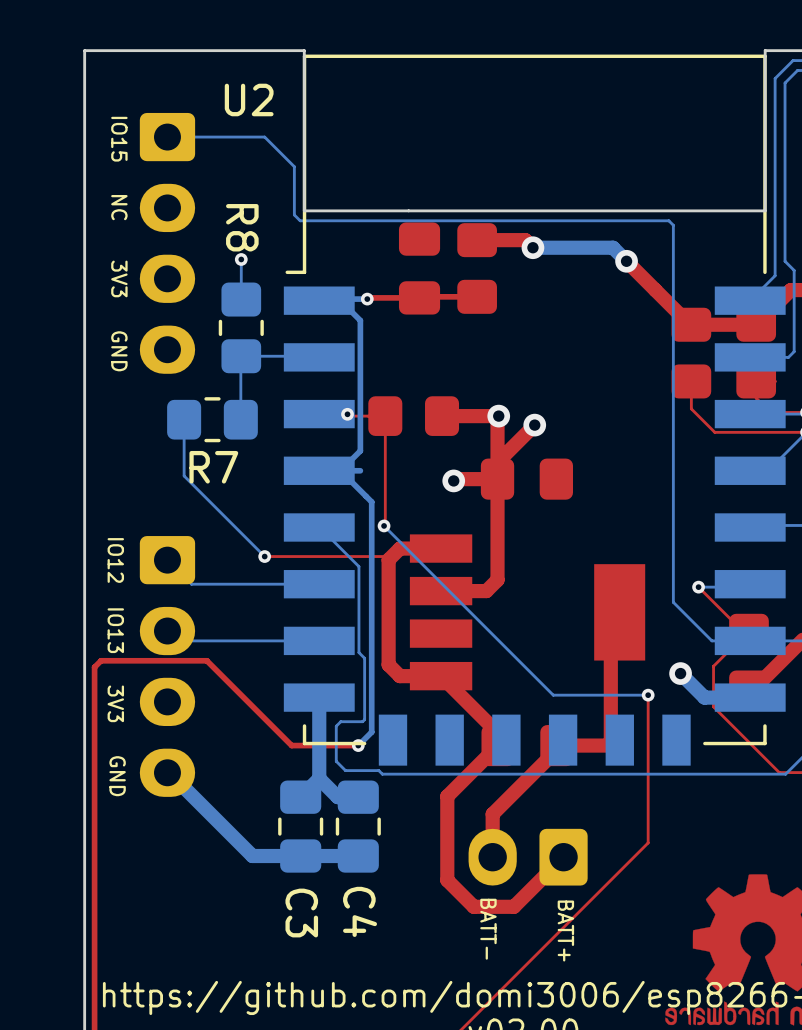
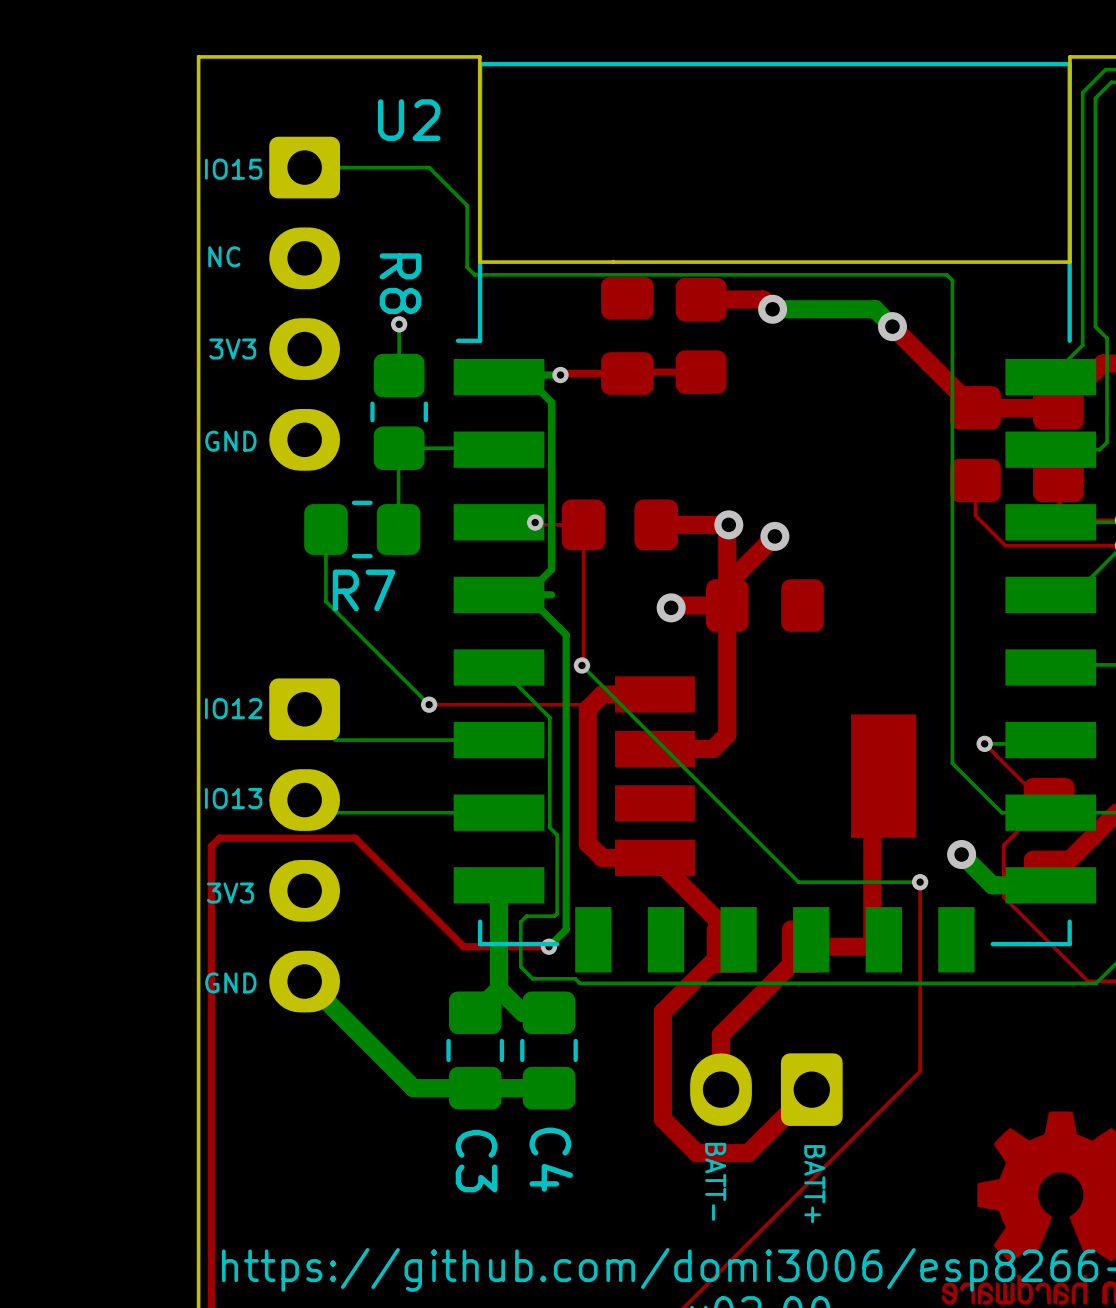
text rotation: 0° (119, 139) -> 90° counterclockwise (233, 169)
text rotation: 0° (119, 207) -> 90° counterclockwise (224, 256)
text rotation: 0° (119, 278) -> 90° counterclockwise (232, 348)
text rotation: 0° (119, 351) -> 90° counterclockwise (230, 441)
text rotation: 0° (115, 560) -> 90° counterclockwise (233, 708)
text rotation: 0° (115, 630) -> 90° counterclockwise (233, 798)
text rotation: 0° (115, 703) -> 90° counterclockwise (230, 893)
text rotation: 0° (117, 776) -> 90° counterclockwise (230, 982)

